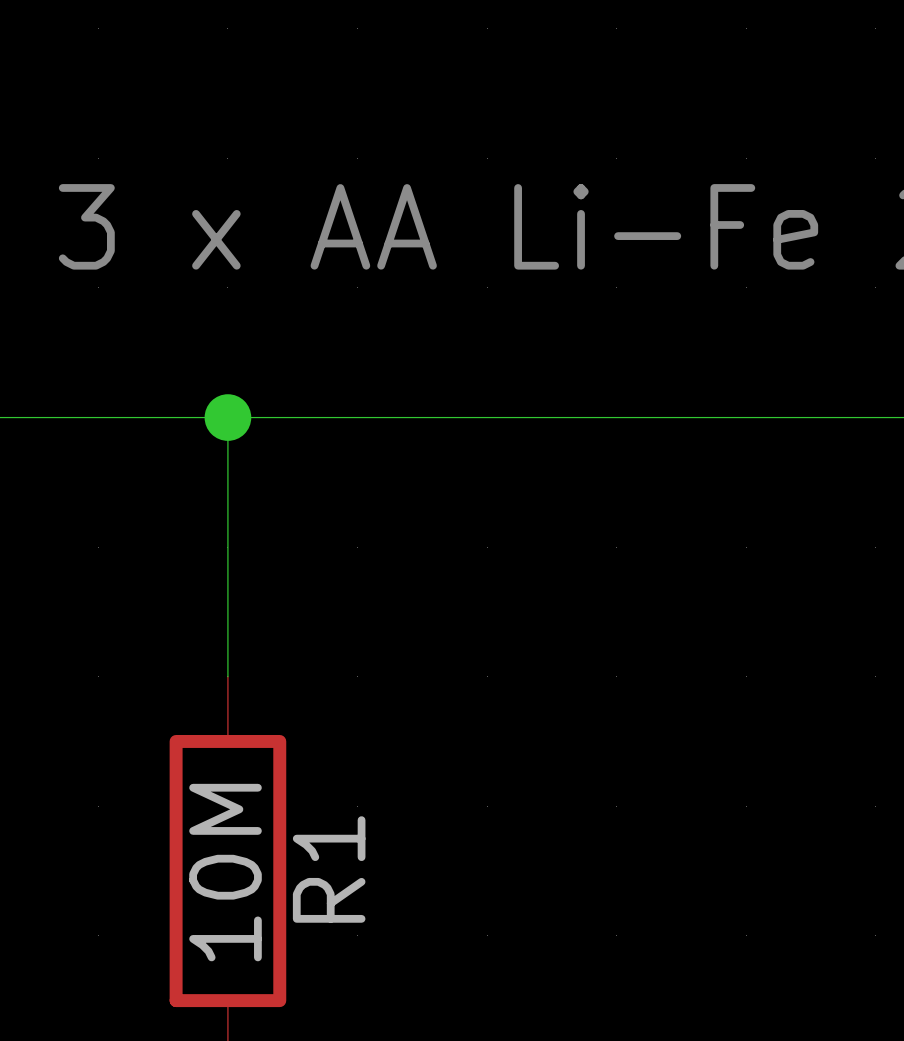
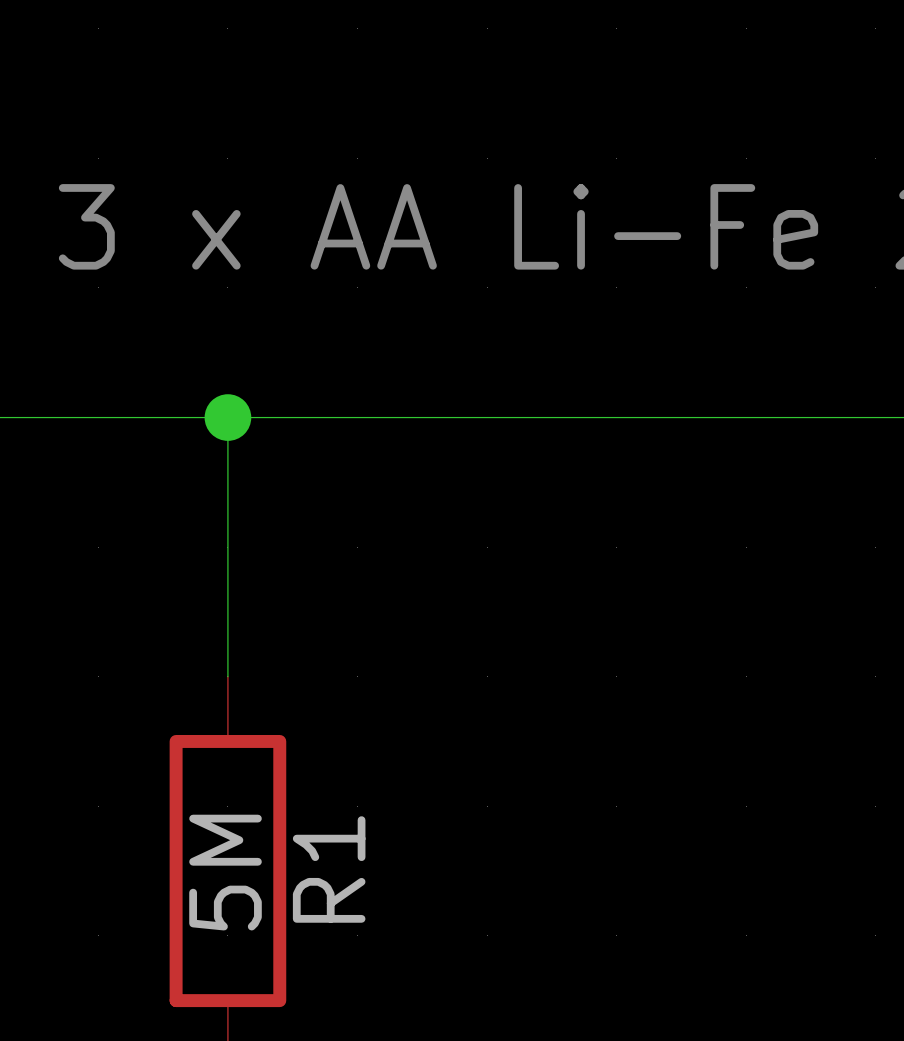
R1 value: 10M (225, 872) -> 5M (225, 872)

